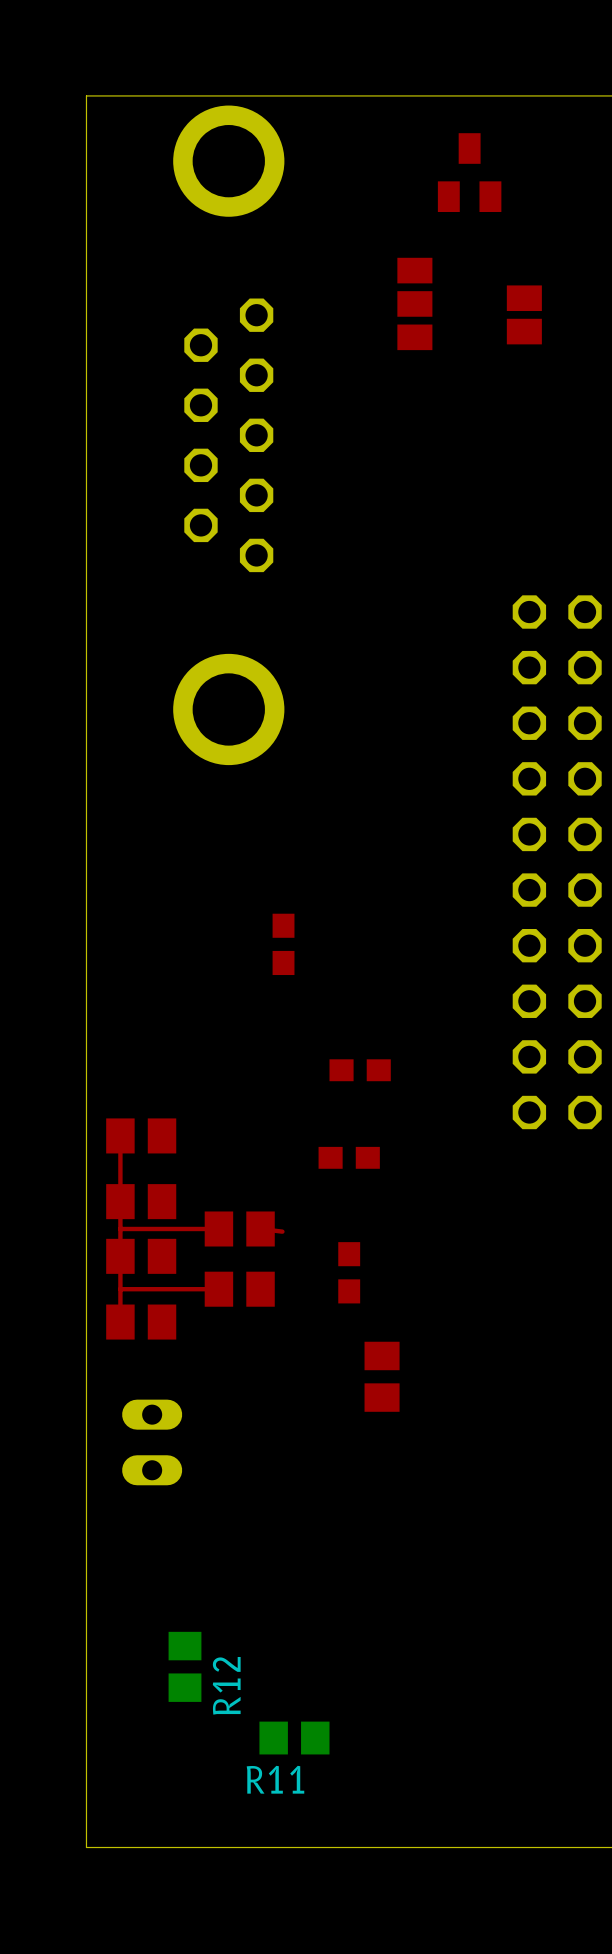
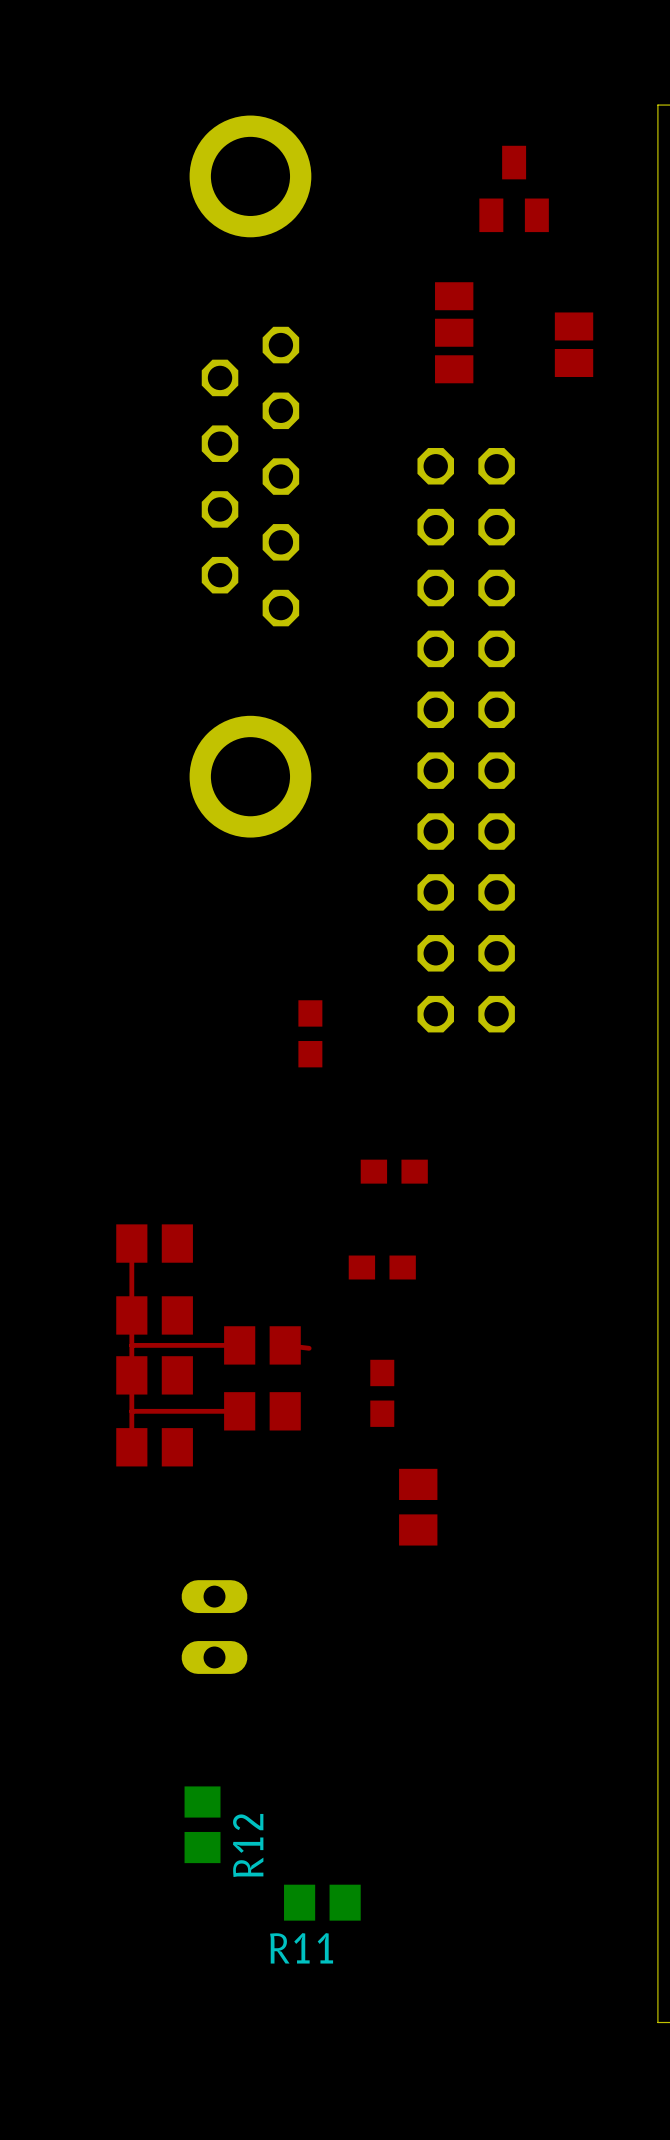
board edge: (600, 95) (86, 95) (86, 1847) (600, 1847) -> (657, 105) (657, 2022)
part position: (557, 862) -> (466, 740)
part position: (152, 1442) -> (214, 1627)

